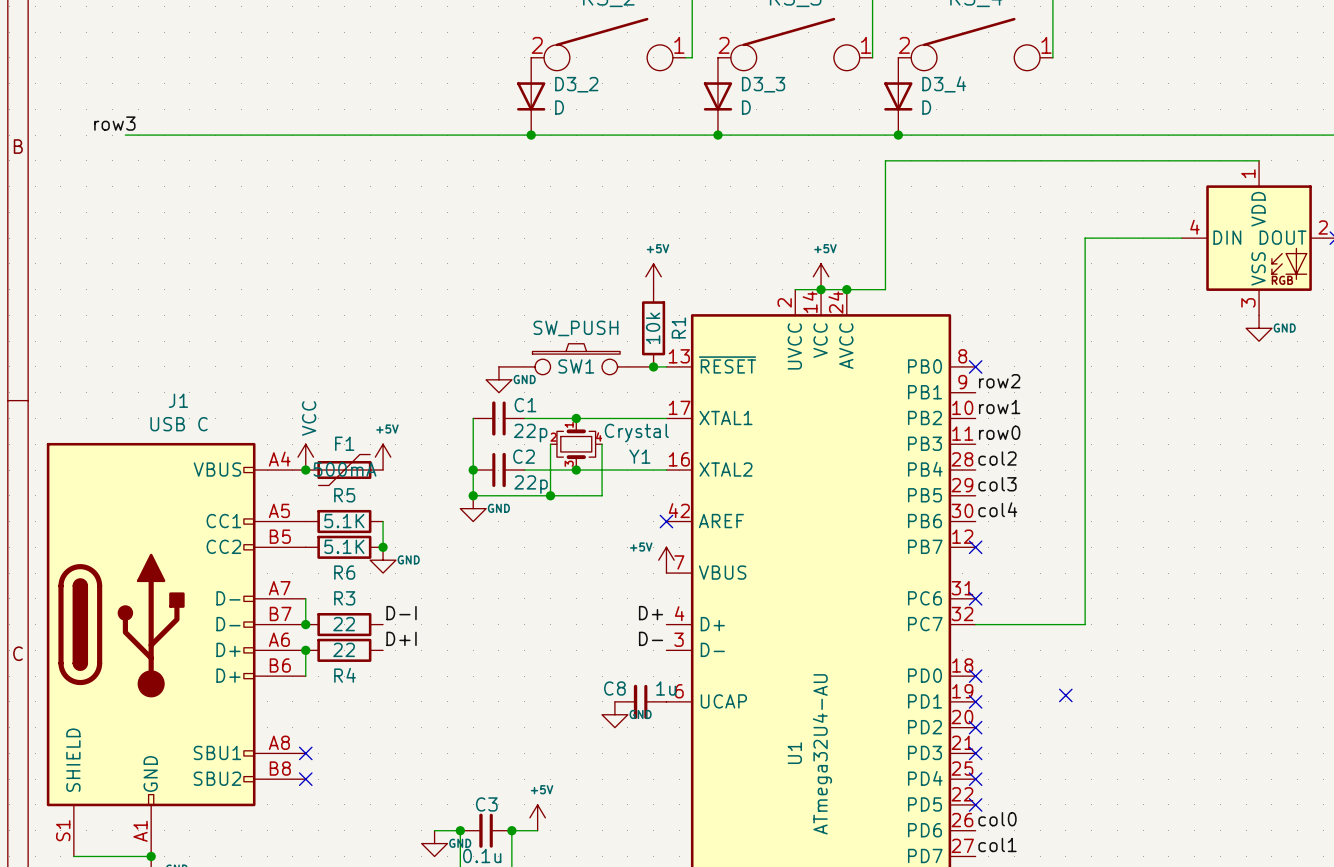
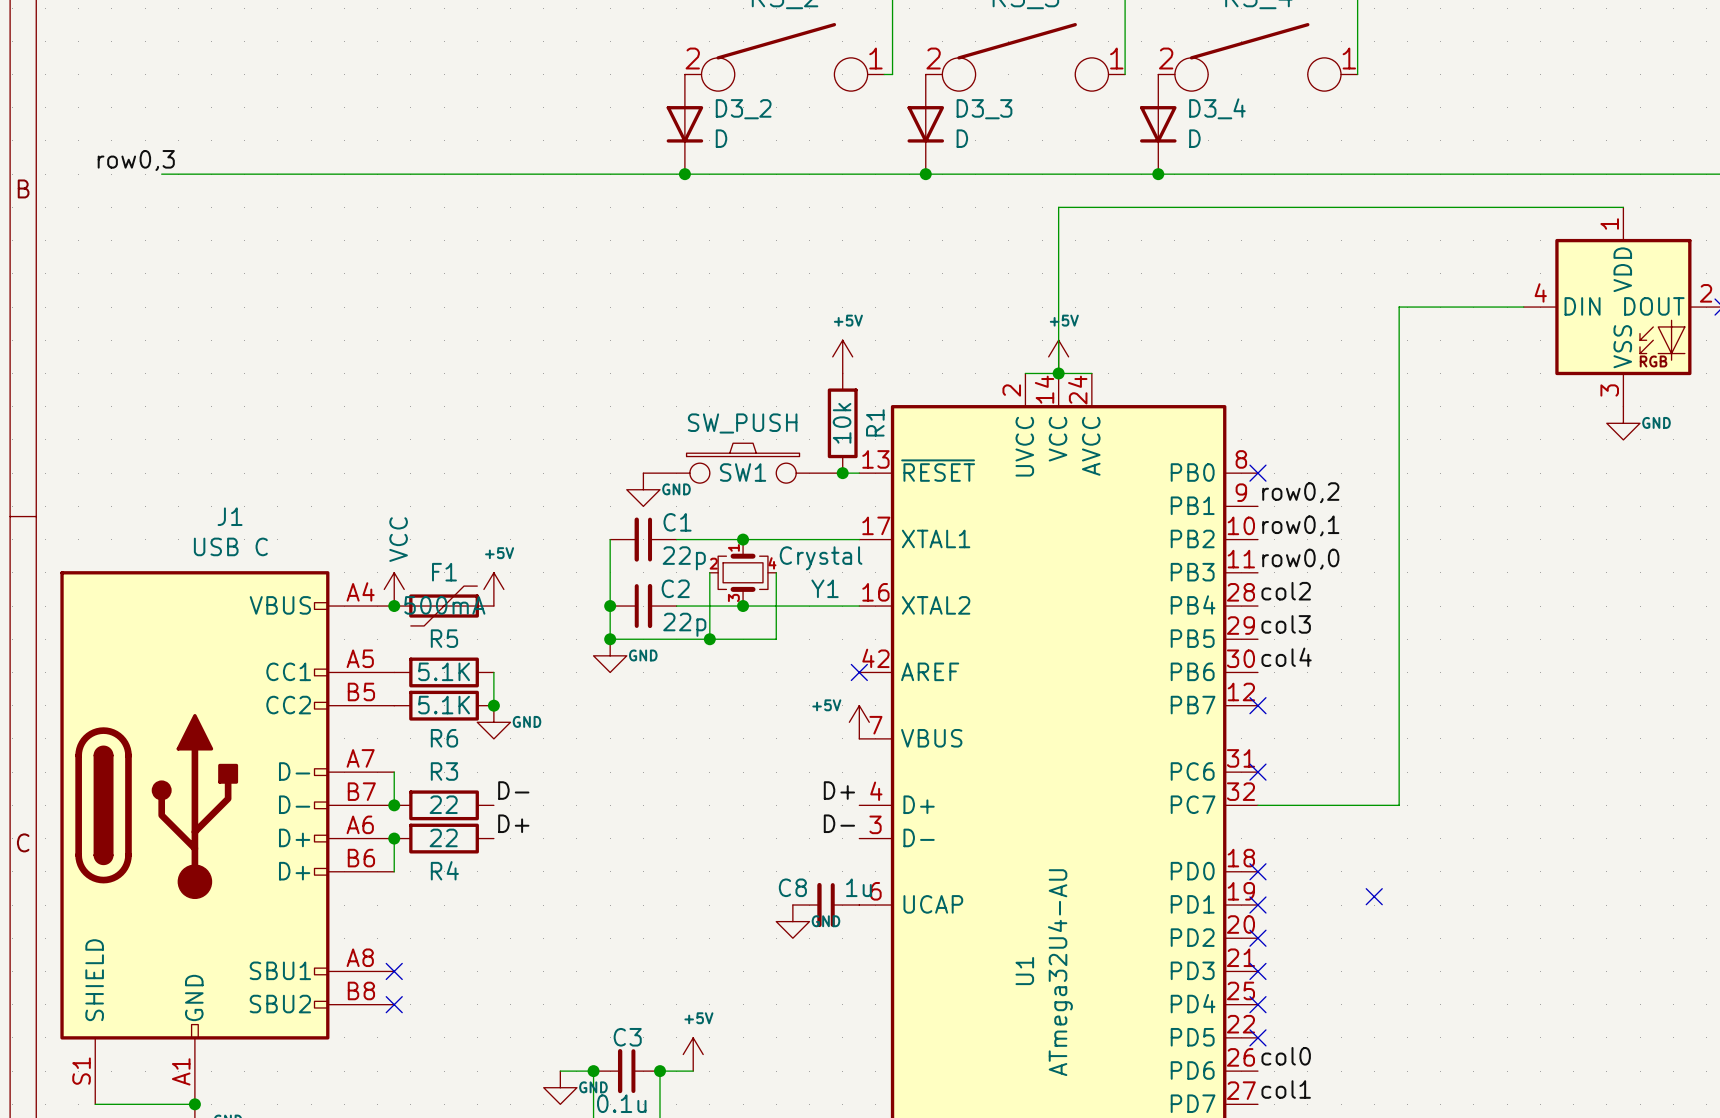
label: row3 (114, 123) -> row0,3 (136, 160)
wire: (885, 160) (885, 289) (846, 289) -> (1141, 207) (1058, 207) (1058, 373)
junction: (846, 289) -> none
label: row2 (999, 381) -> row0,2 (1300, 492)
label: row1 (999, 406) -> row0,1 (1300, 525)
label: row0 (999, 432) -> row0,0 (1300, 559)
label: D-I (401, 613) -> D- (513, 790)
label: D+I (401, 638) -> D+ (513, 823)

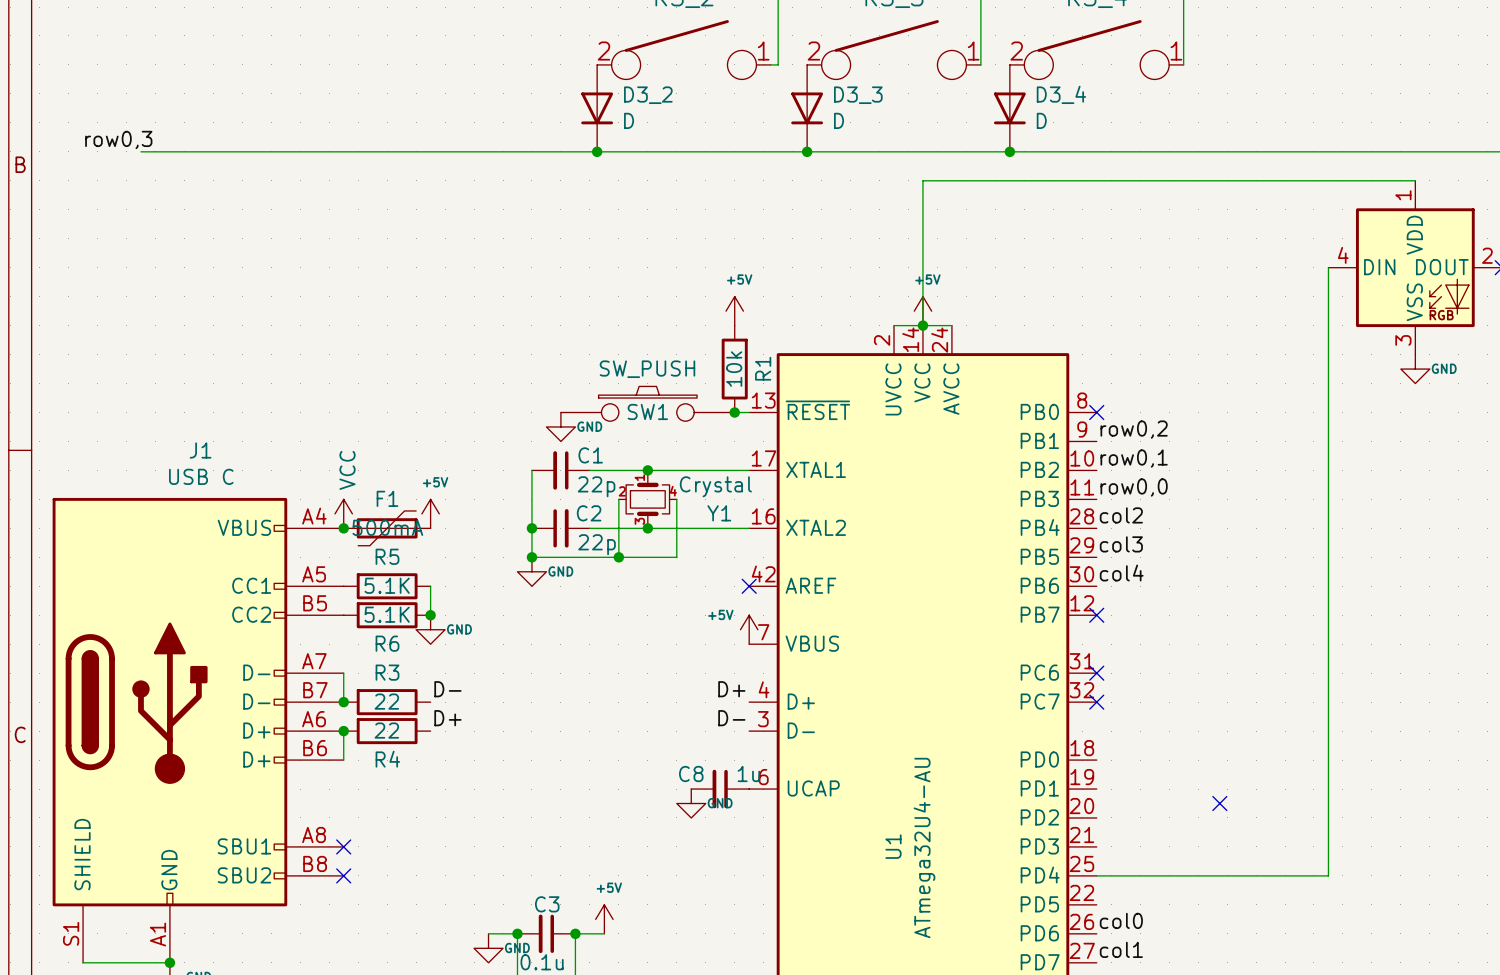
wire: (1523, 307) (1399, 307) (1399, 805) (1257, 805) -> (1328, 267) (1328, 875) (1096, 875)
no-connect mark: none -> (1096, 702)
no-connect mark: (1257, 871) -> none
no-connect mark position: (1374, 896) -> (1219, 803)
no-connect mark: (1257, 905) -> none
no-connect mark: (1257, 938) -> none
no-connect mark: (1257, 971) -> none
no-connect mark: (1257, 1004) -> none
no-connect mark: (1257, 1037) -> none

